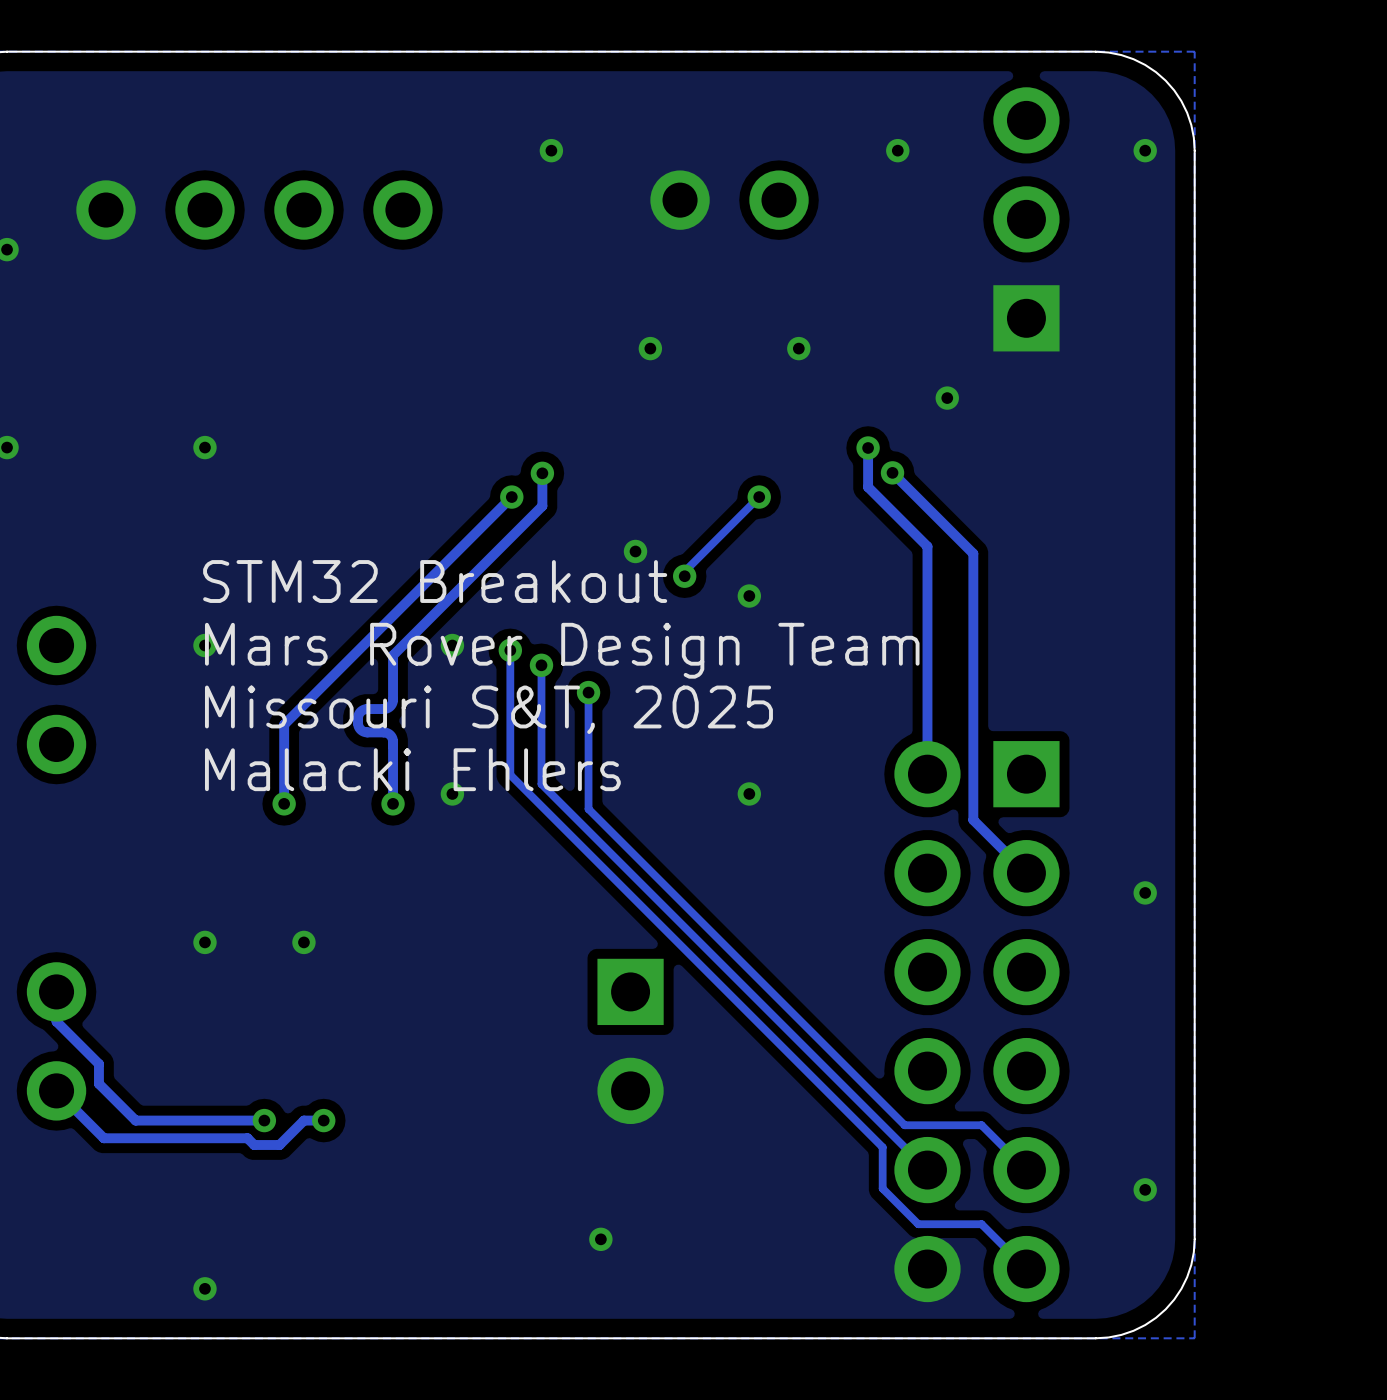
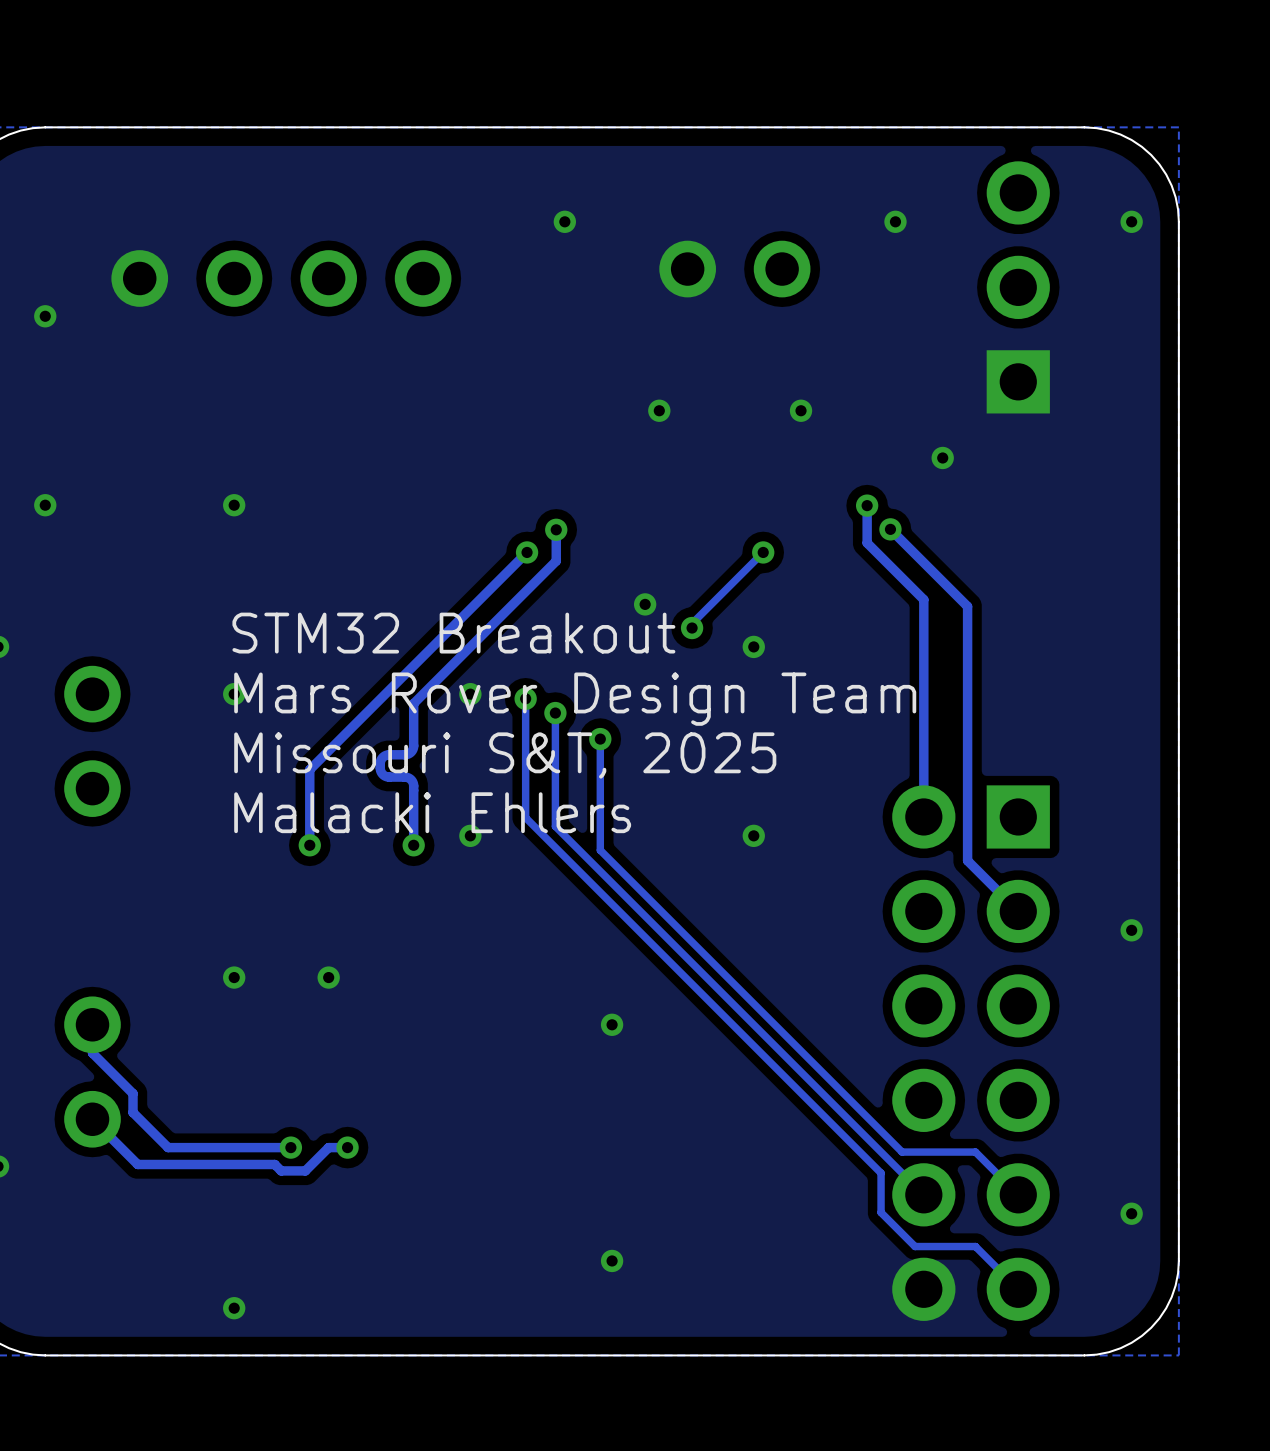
via: none -> (612, 1024)
part: (630, 1041) -> none

